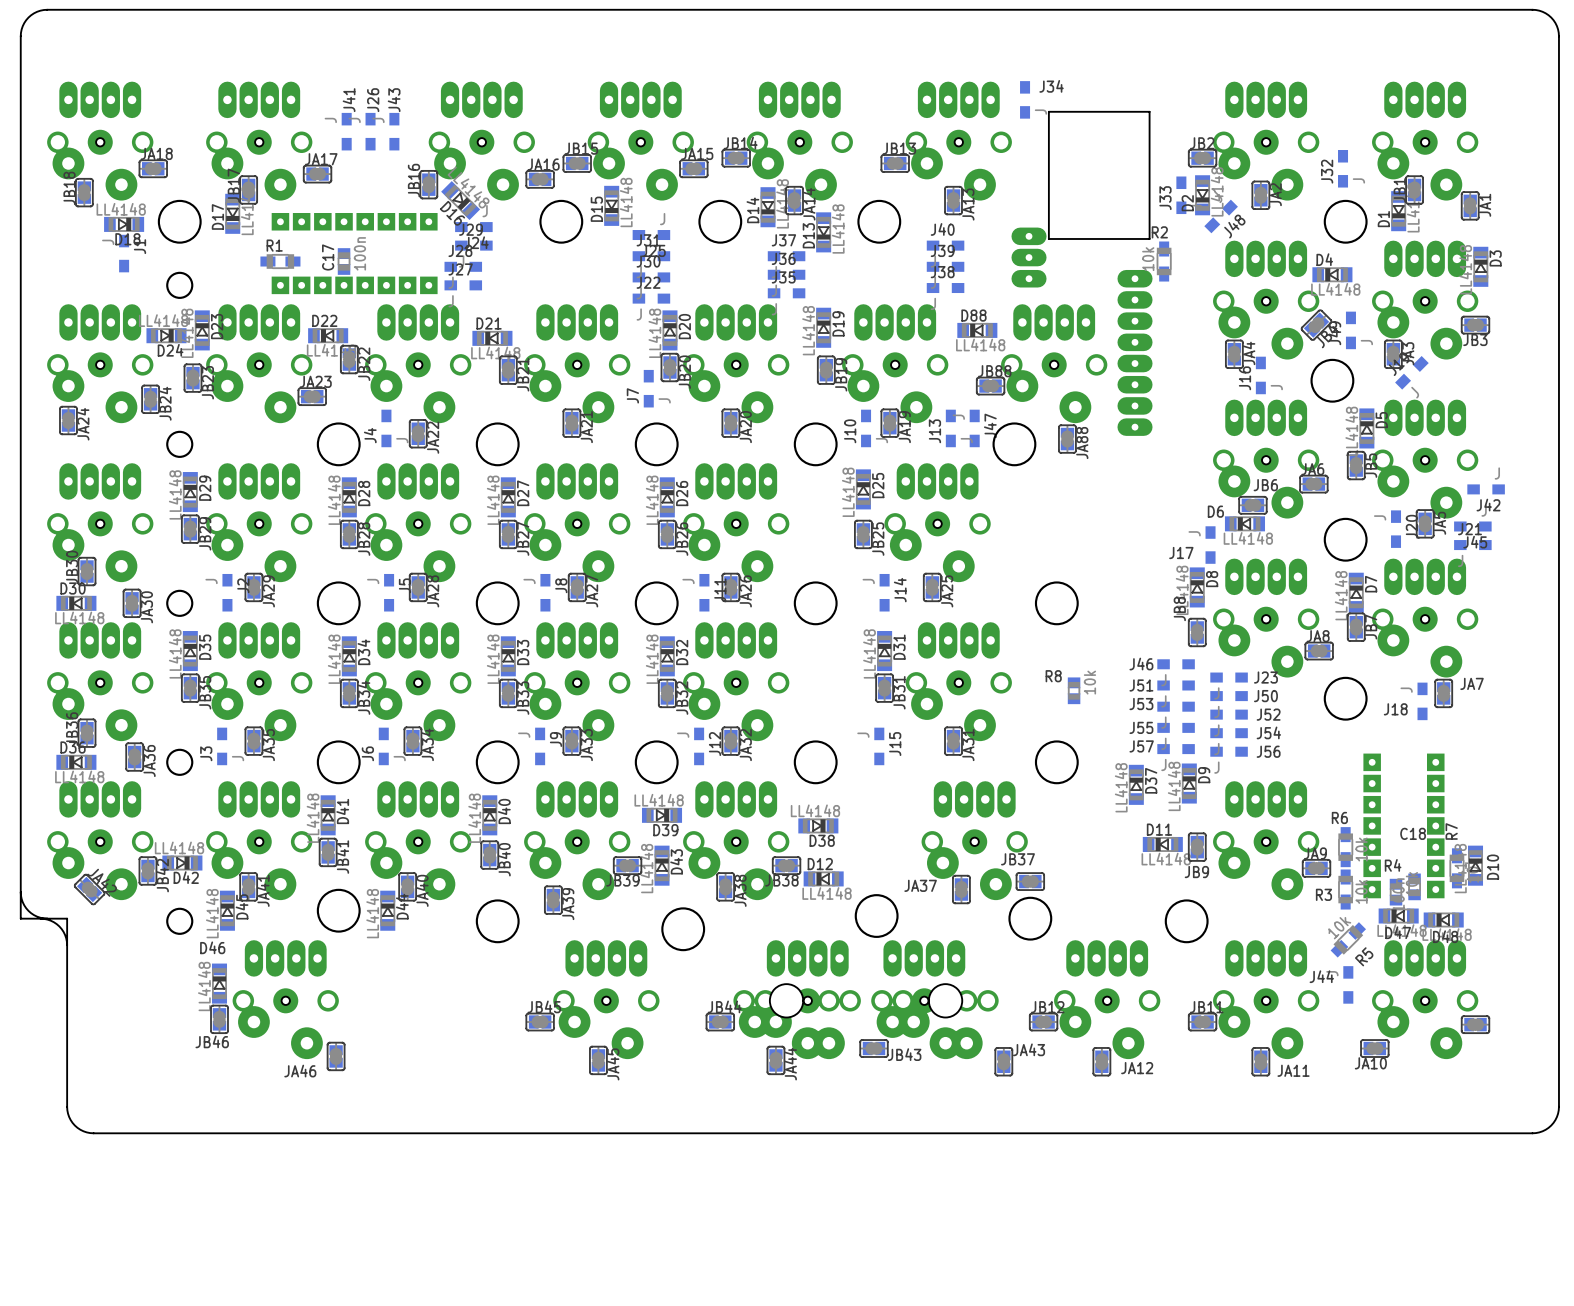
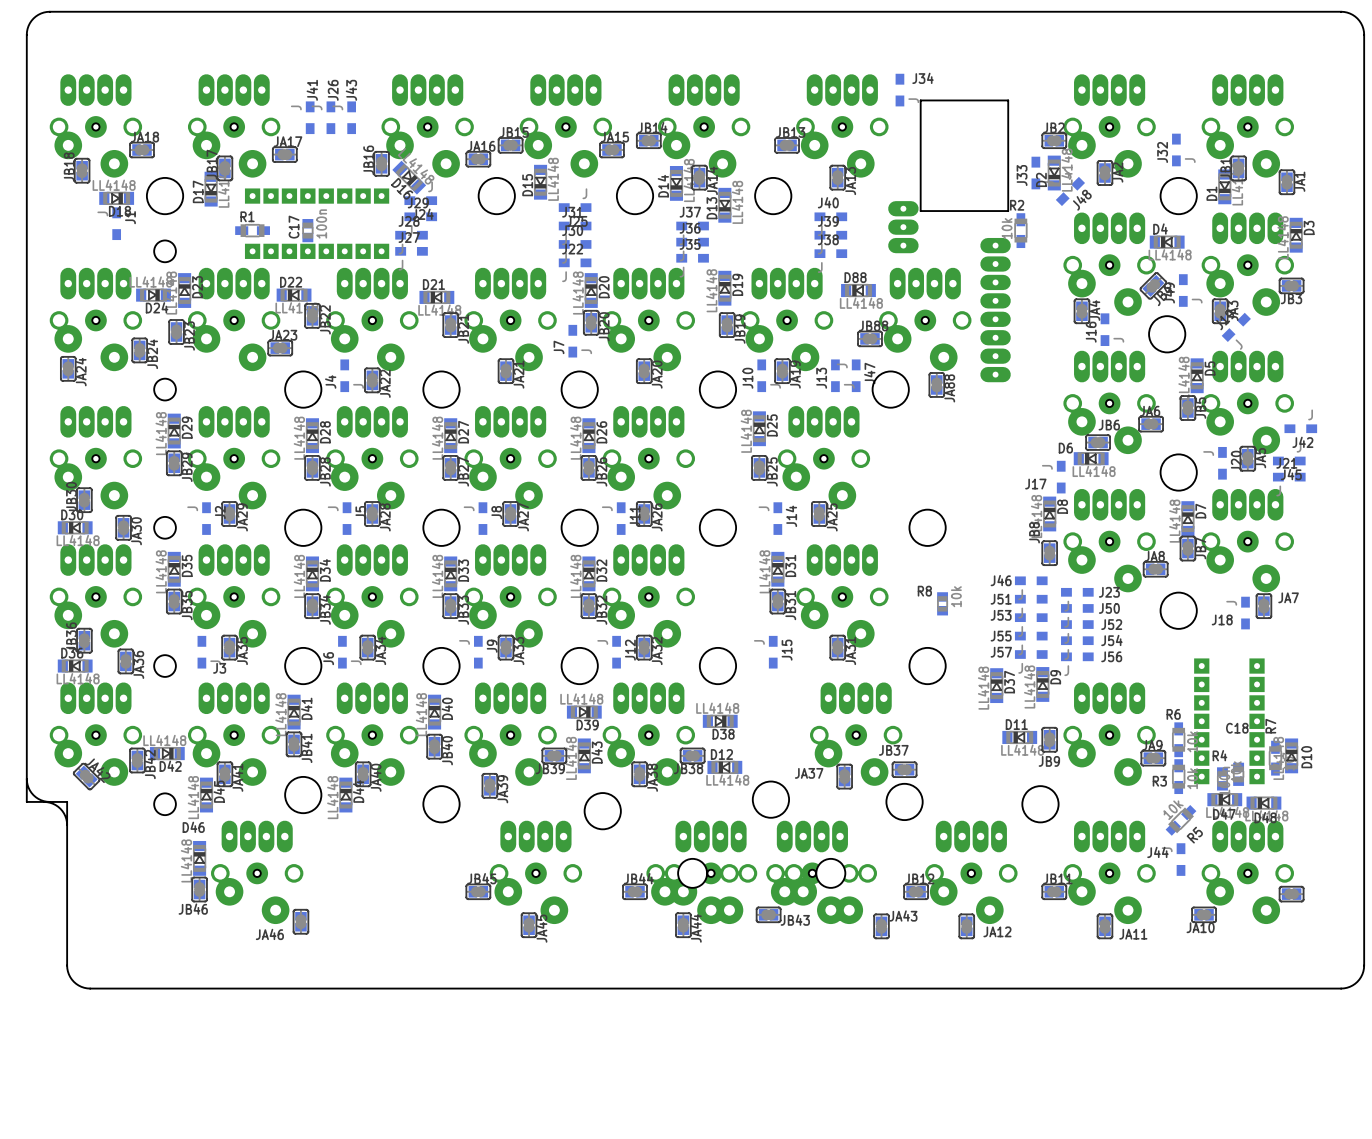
J3 name rotation: 0° (206, 753) -> 90° clockwise (219, 668)
J3 name position: J3 (206, 753) -> J3 (219, 668)

